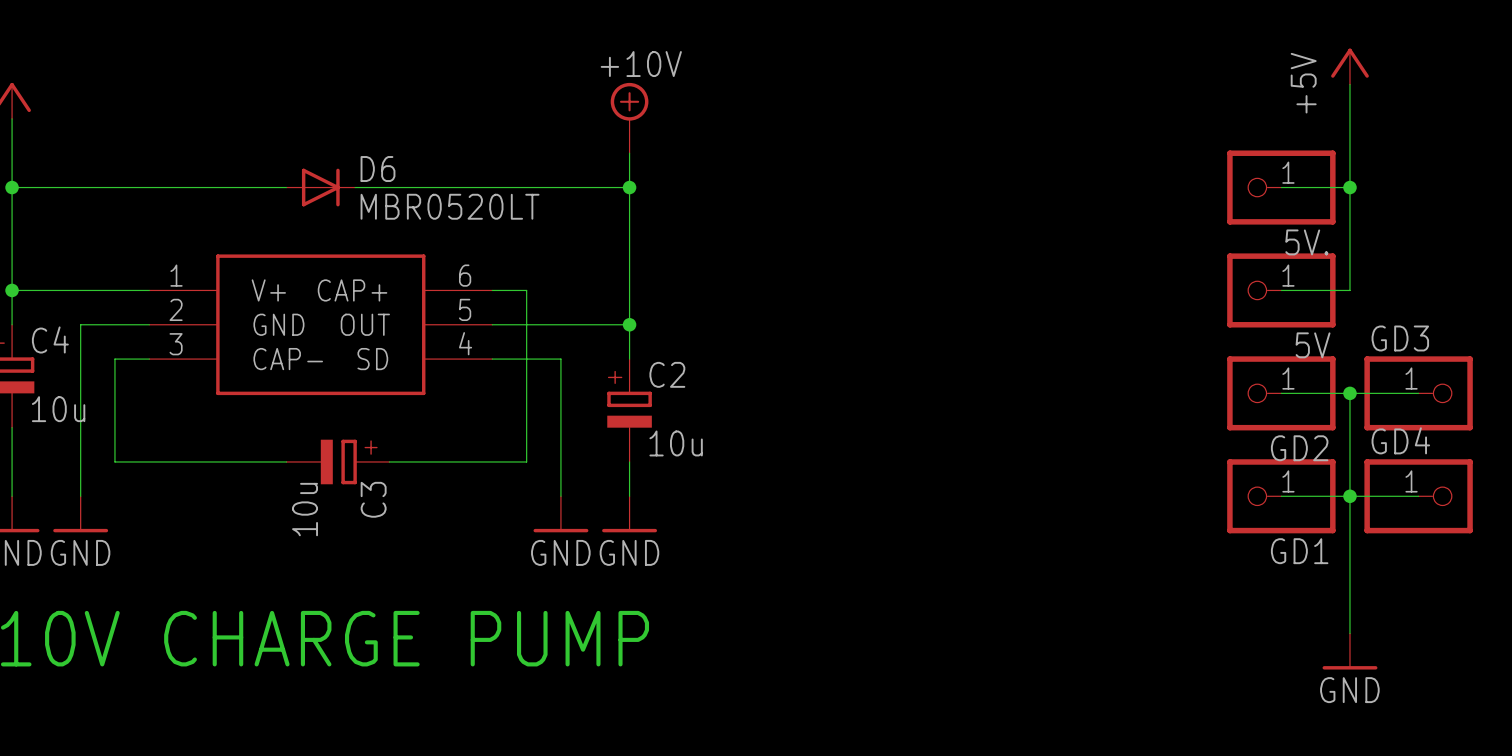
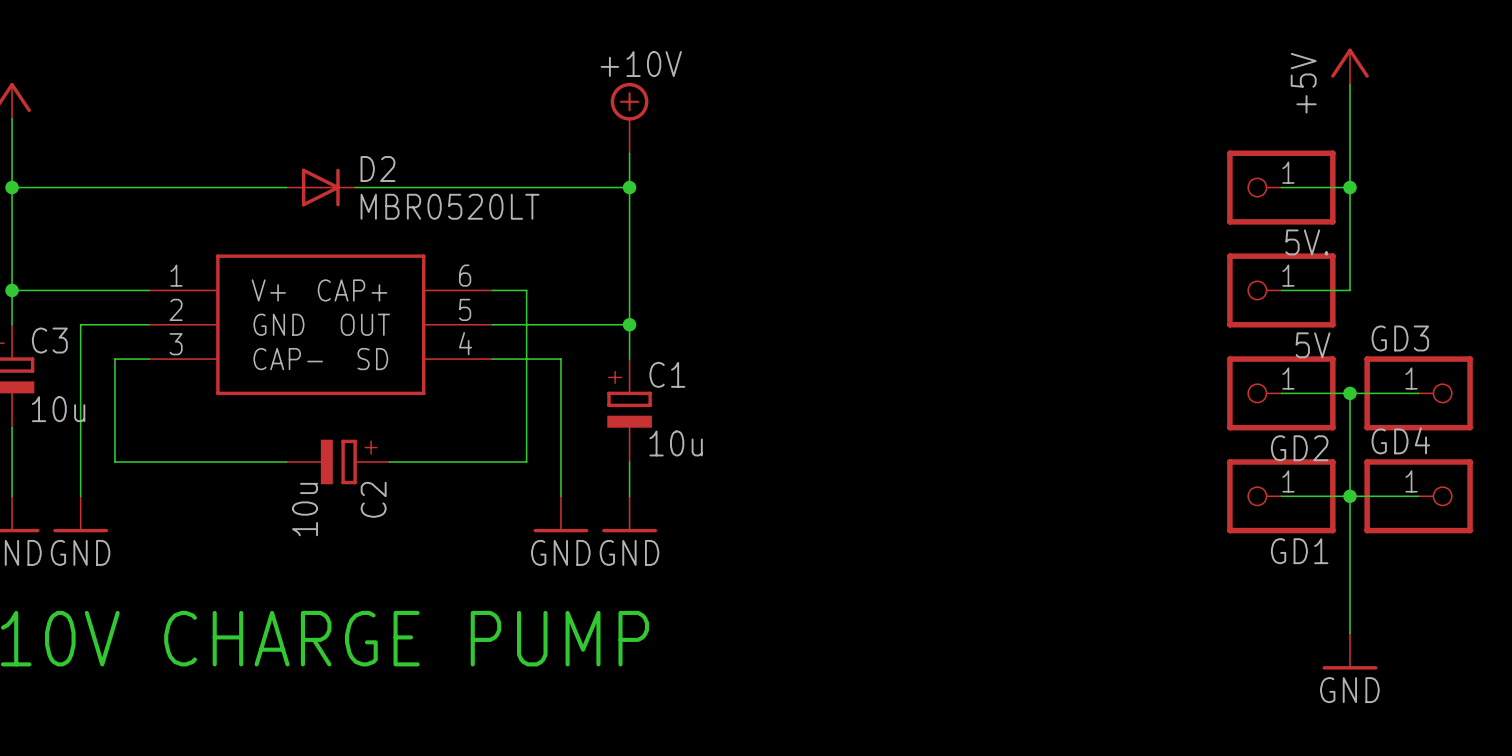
D6 name: D6 (377, 169) -> D2 (377, 169)
C4 name: C4 (50, 339) -> C3 (49, 340)
C2 name: C2 (667, 374) -> C1 (667, 374)
C3 name: C3 (373, 499) -> C2 (373, 499)

